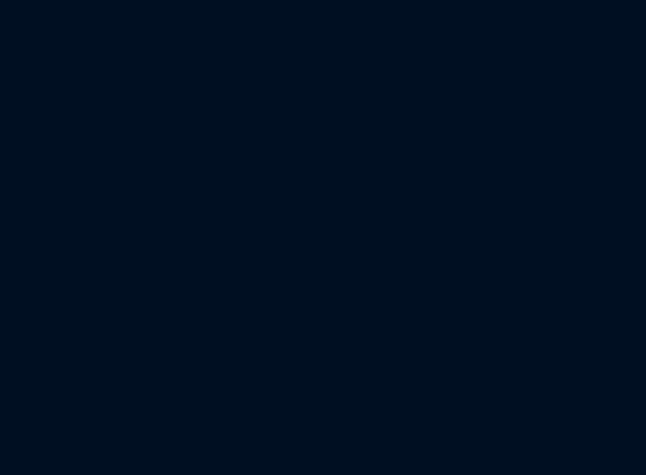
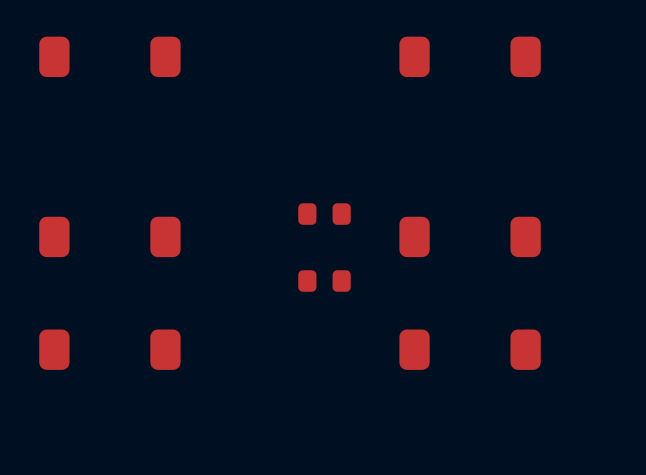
part: none -> (109, 56)
part: none -> (470, 56)
part: none -> (324, 214)
part: none -> (109, 236)
part: none -> (470, 236)
part: none -> (324, 281)
part: none -> (109, 349)
part: none -> (470, 349)

